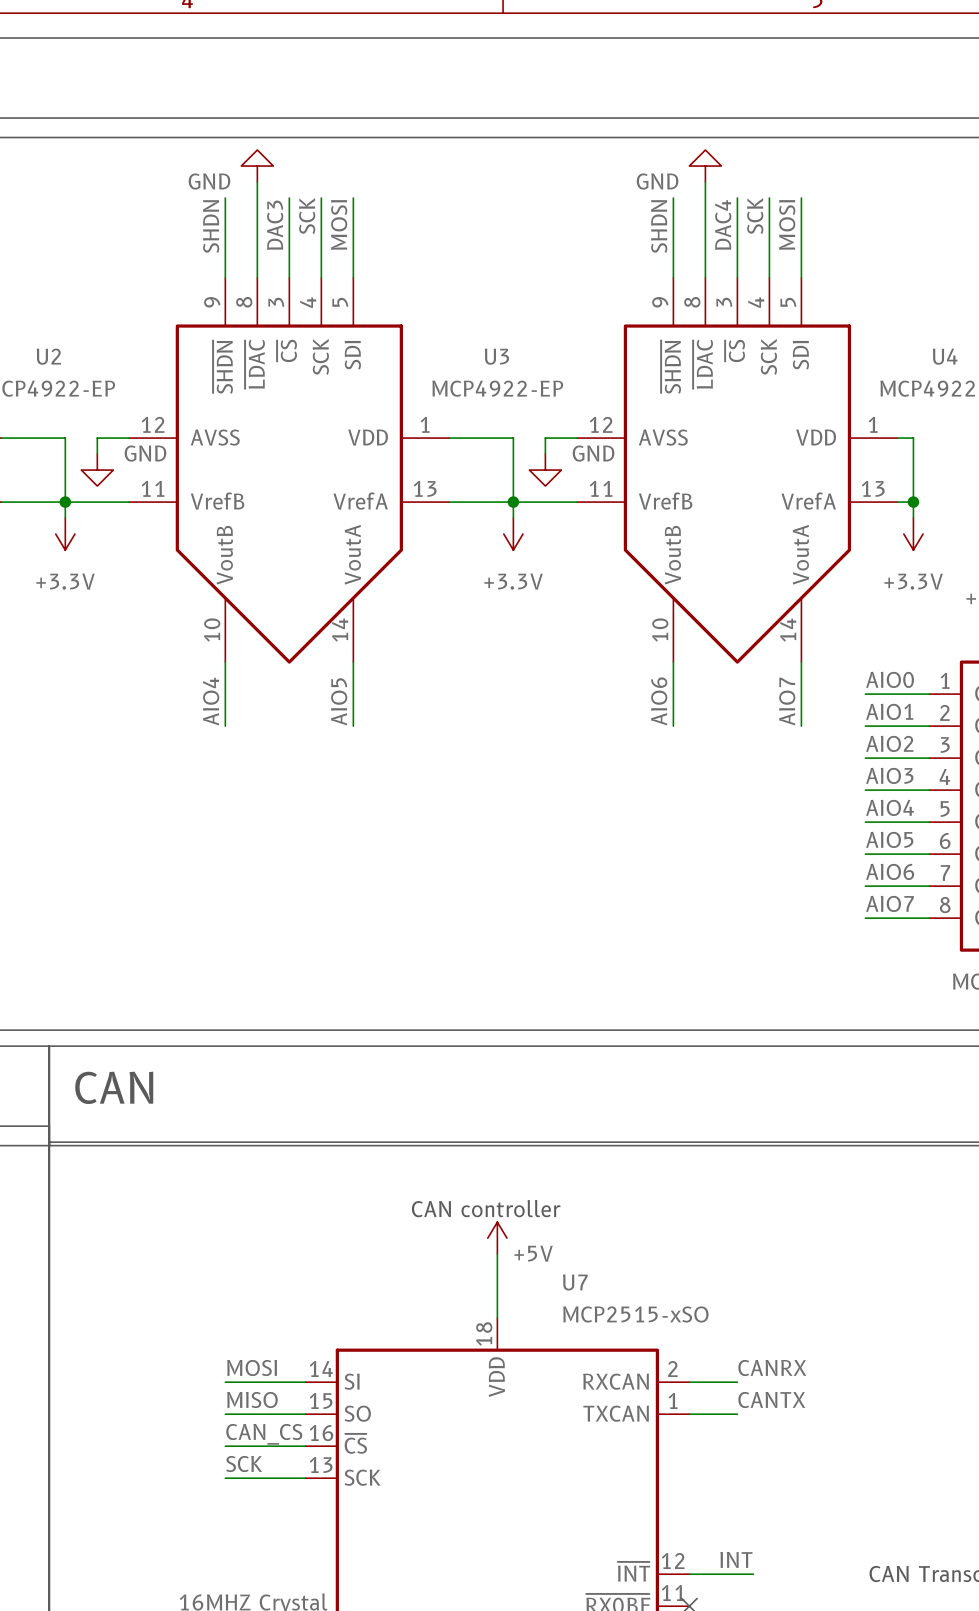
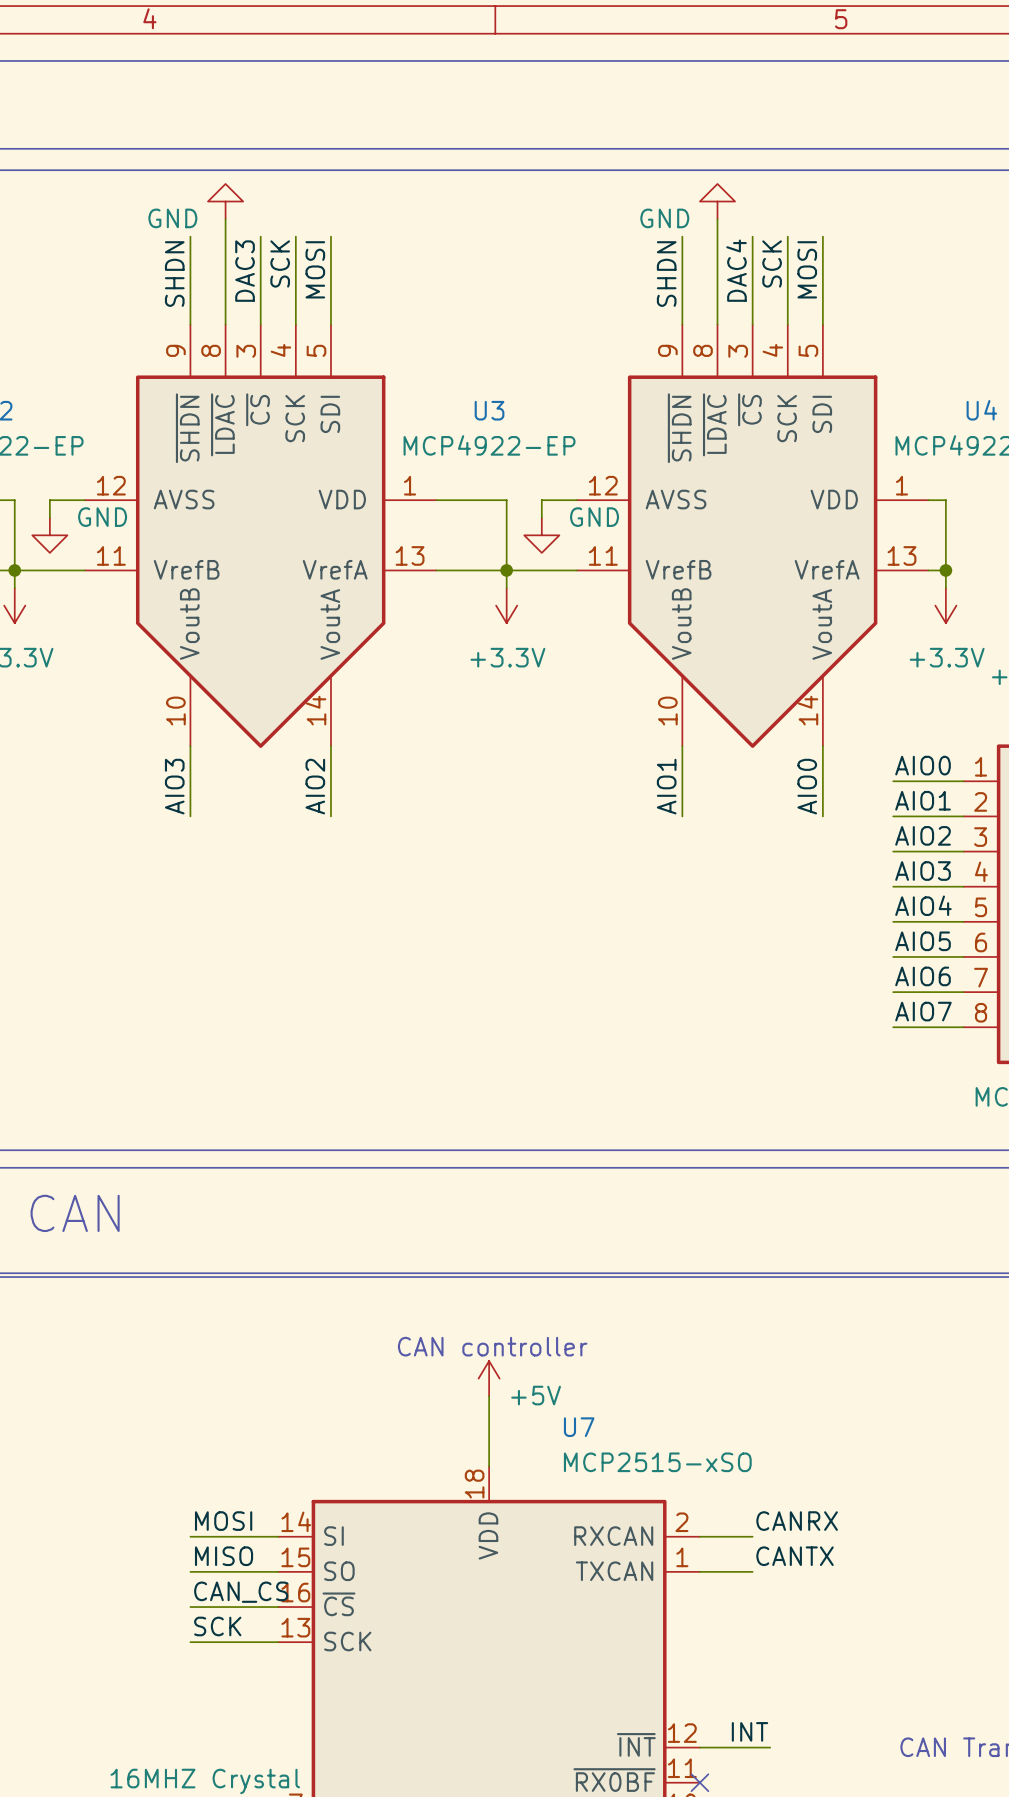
label: AIO4 (211, 701) -> AIO3 (174, 786)
label: AIO5 (339, 701) -> AIO2 (315, 786)
label: AIO6 (659, 701) -> AIO1 (666, 786)
label: AIO7 (787, 701) -> AIO0 (807, 786)

